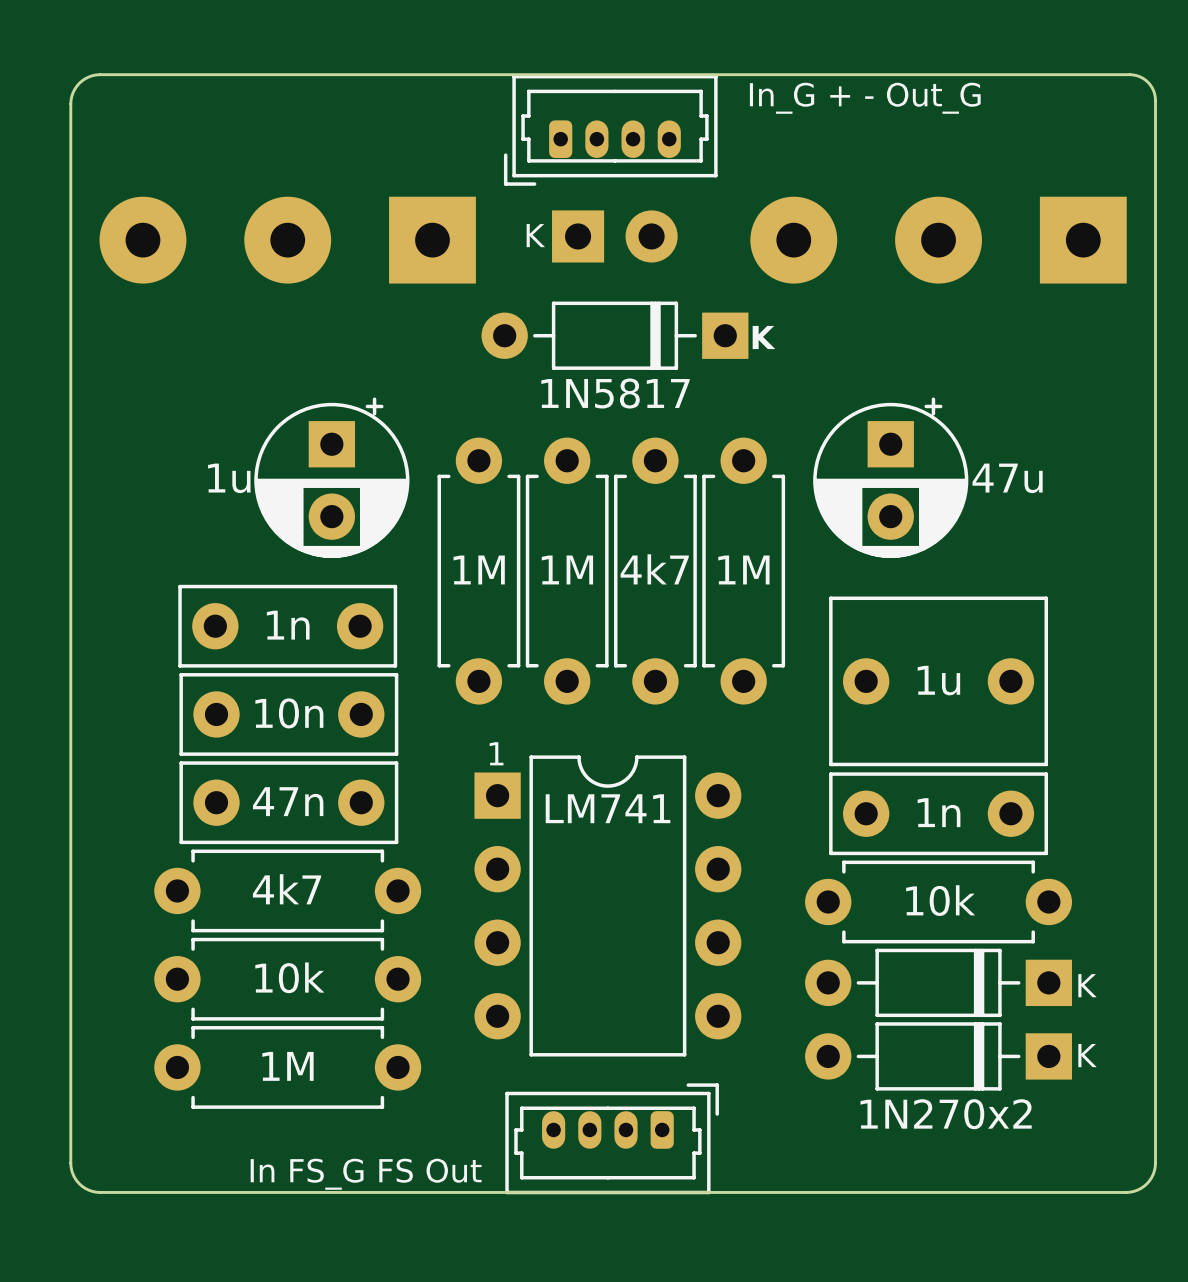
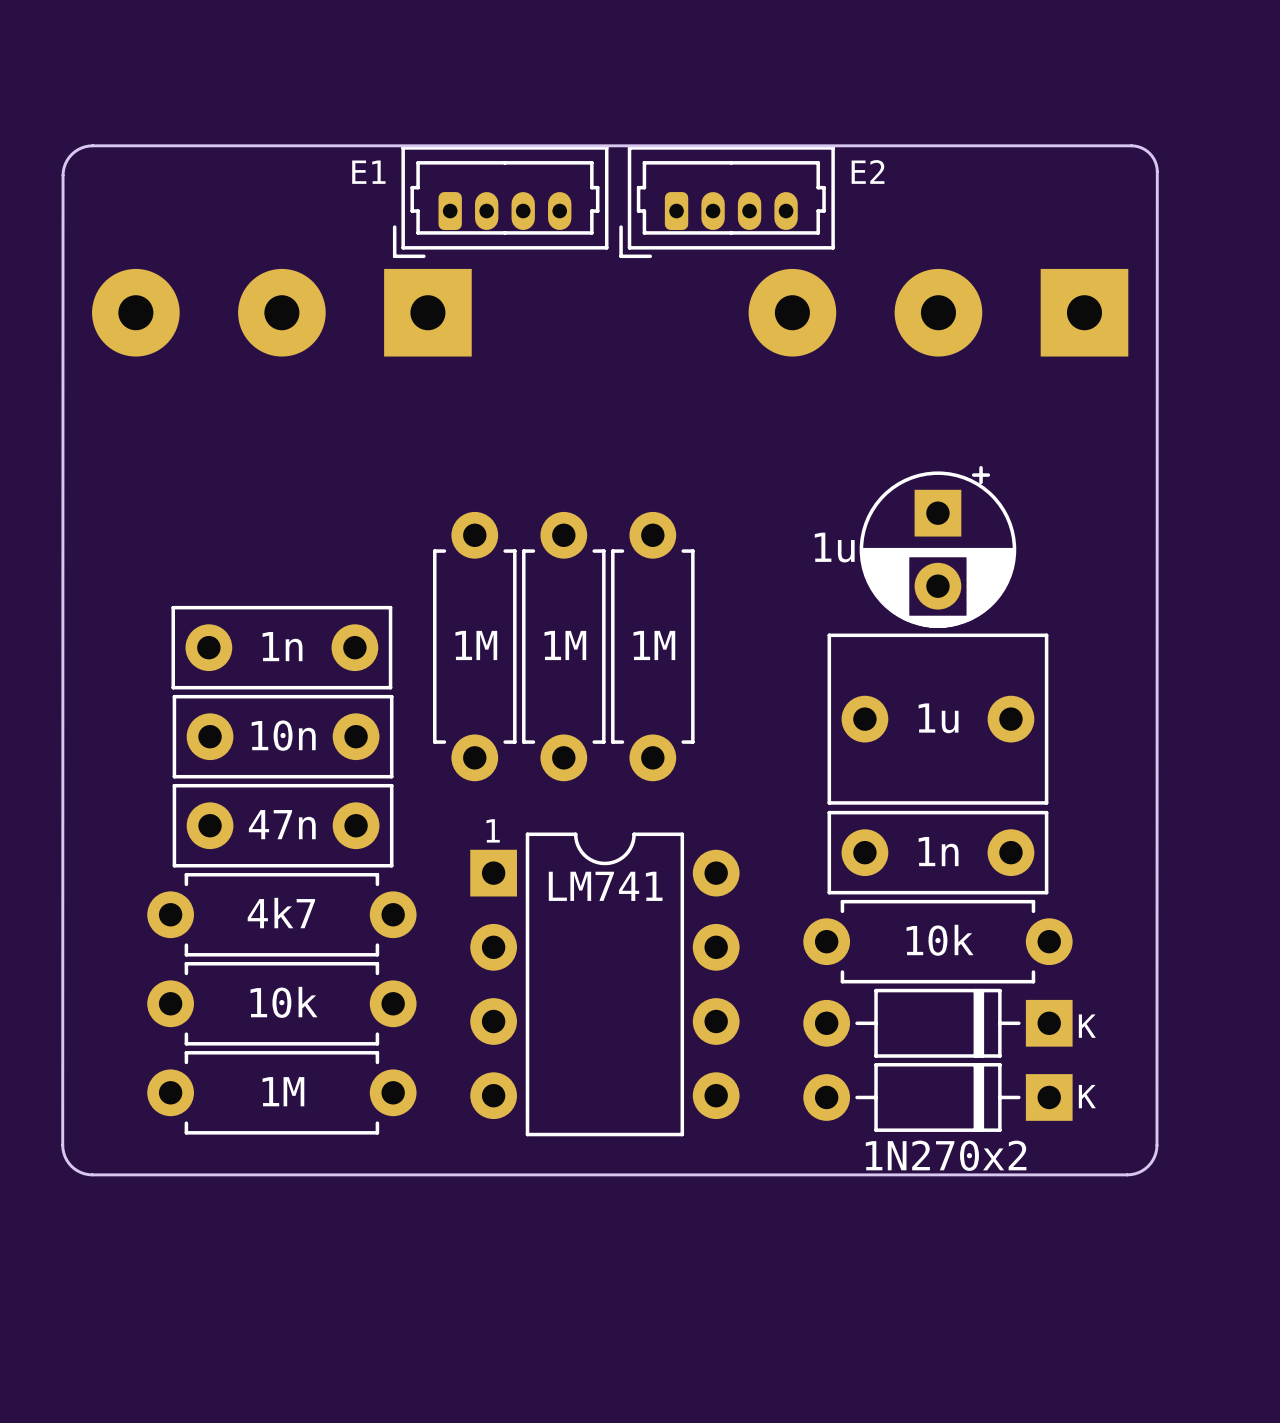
board edge: (1155, 100) (1155, 1163) (1153, 1174) (1146, 1183) (1137, 1190) (1126, 1192) (100, 1192) (88, 1190) (79, 1183) (73, 1174) (70, 1163) (70, 104) -> (1157, 171) (1156, 1145) (1154, 1156) (1148, 1166) (1138, 1172) (1127, 1174) (92, 1174) (81, 1172) (71, 1166) (64, 1156) (62, 1145) (63, 175)
part: none -> E1 (500, 202)
part: (610, 130) -> none
part: none -> E2 (727, 202)
part: (614, 236) -> none
part: 1N5817 (614, 335) -> none
part position: (331, 477) -> (937, 546)
part: 47u (890, 477) -> none
part value: 4k7 (654, 569) -> 1M (654, 645)
part: 1M (743, 571) -> none
part position: (287, 626) -> (281, 647)
part position: (938, 681) -> (937, 719)
part position: (288, 714) -> (283, 736)
part position: (288, 802) -> (283, 825)
part position: (938, 813) -> (937, 852)
part position: (287, 890) -> (281, 914)
part position: (938, 901) -> (937, 941)
part position: (287, 979) -> (281, 1003)
part position: (938, 982) -> (937, 1023)
part position: (938, 1056) -> (937, 1097)
part position: (287, 1067) -> (281, 1092)
part: (612, 1138) -> none

